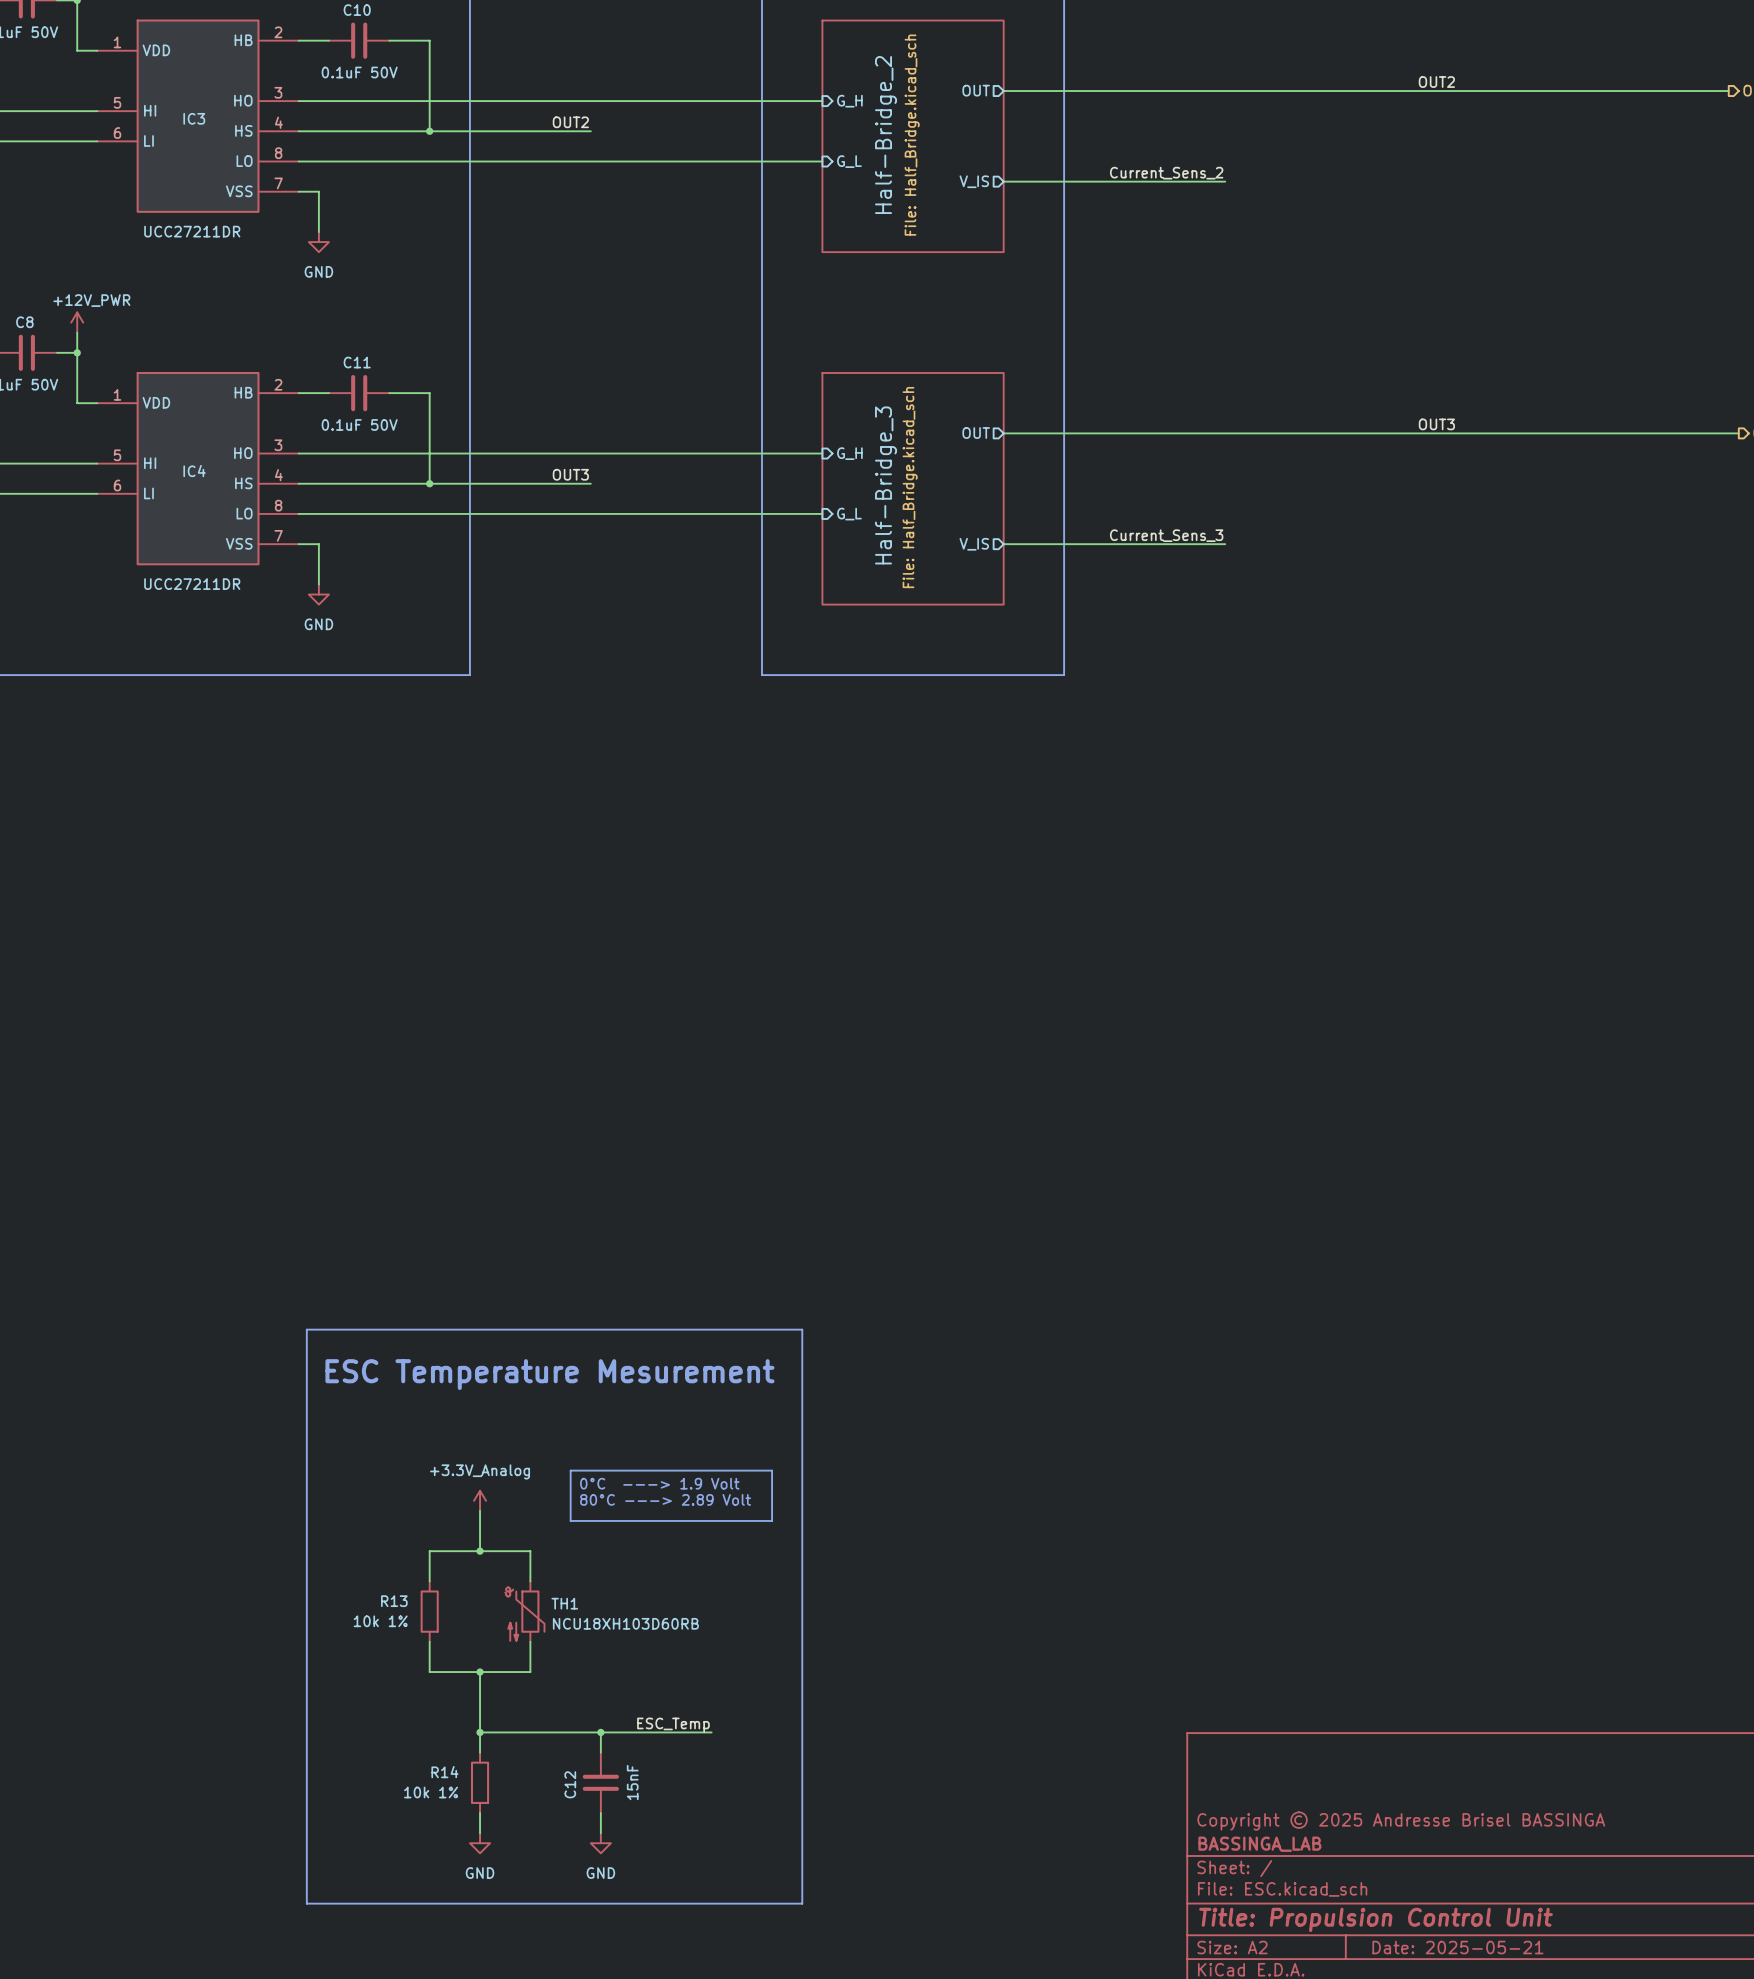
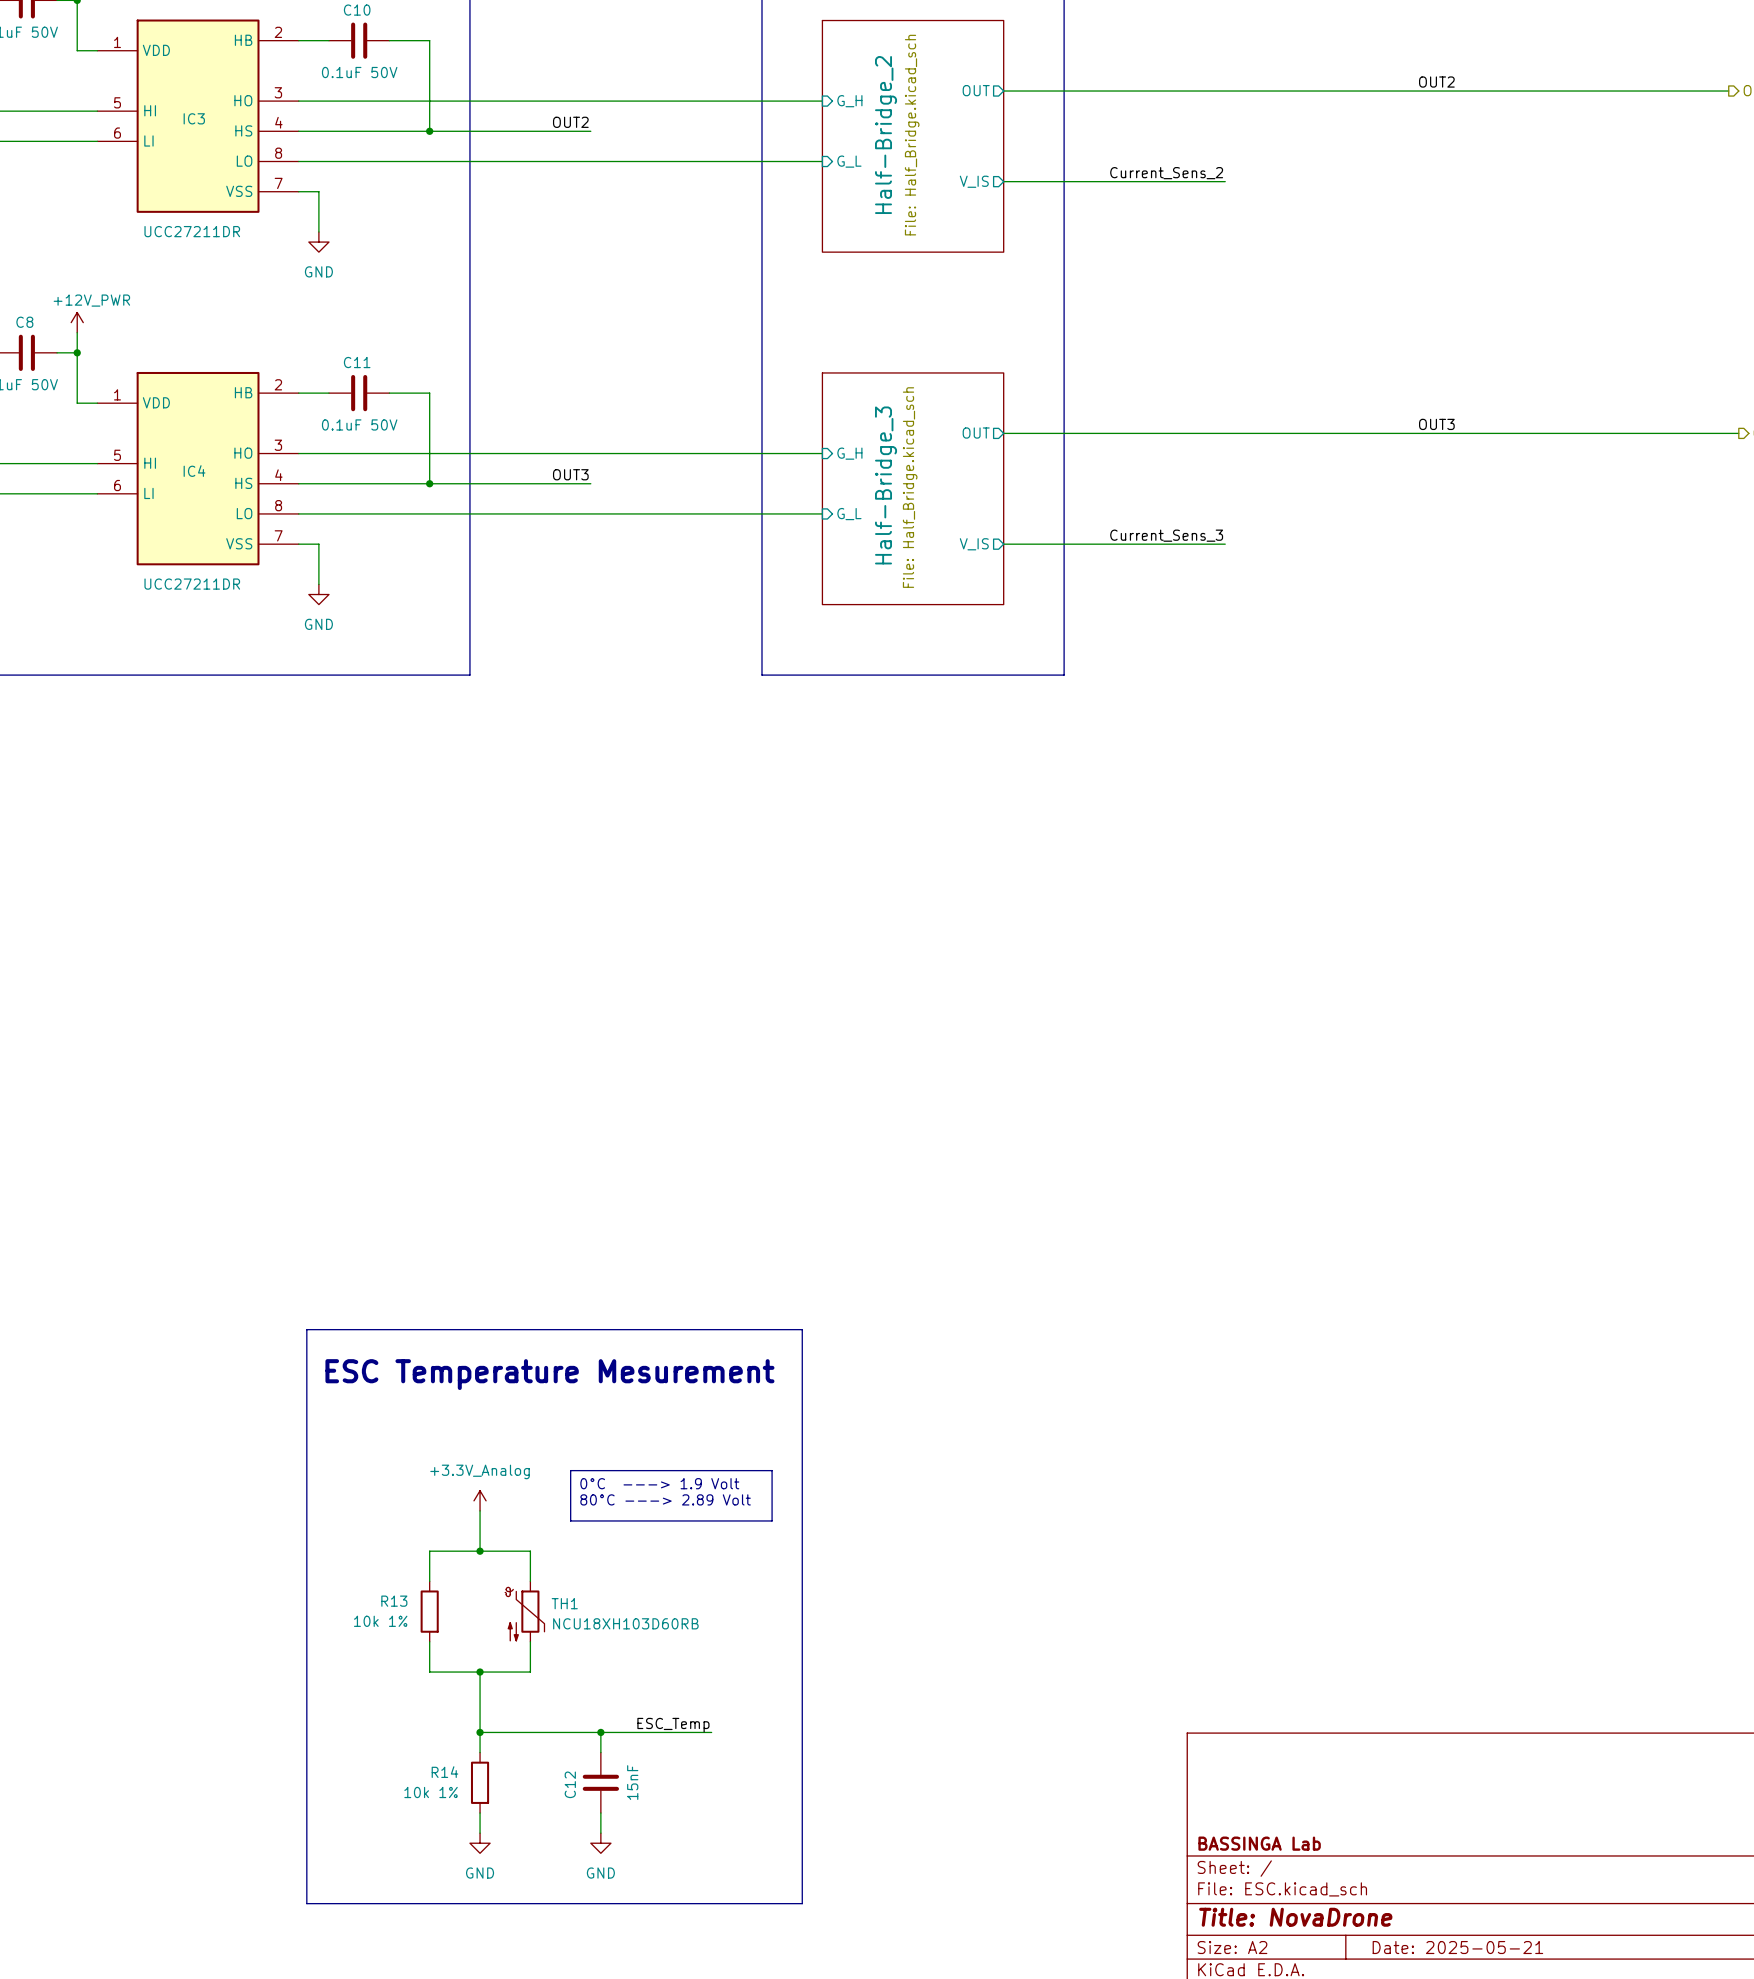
title block: Copyright © 2025 Andresse Brisel BASSINGA (1401, 1820) -> none
title block: BASSINGA_LAB (1259, 1844) -> BASSINGA Lab (1259, 1843)
title block: Title: Propulsion Control Unit (1376, 1919) -> Title: NovaDrone (1295, 1917)

